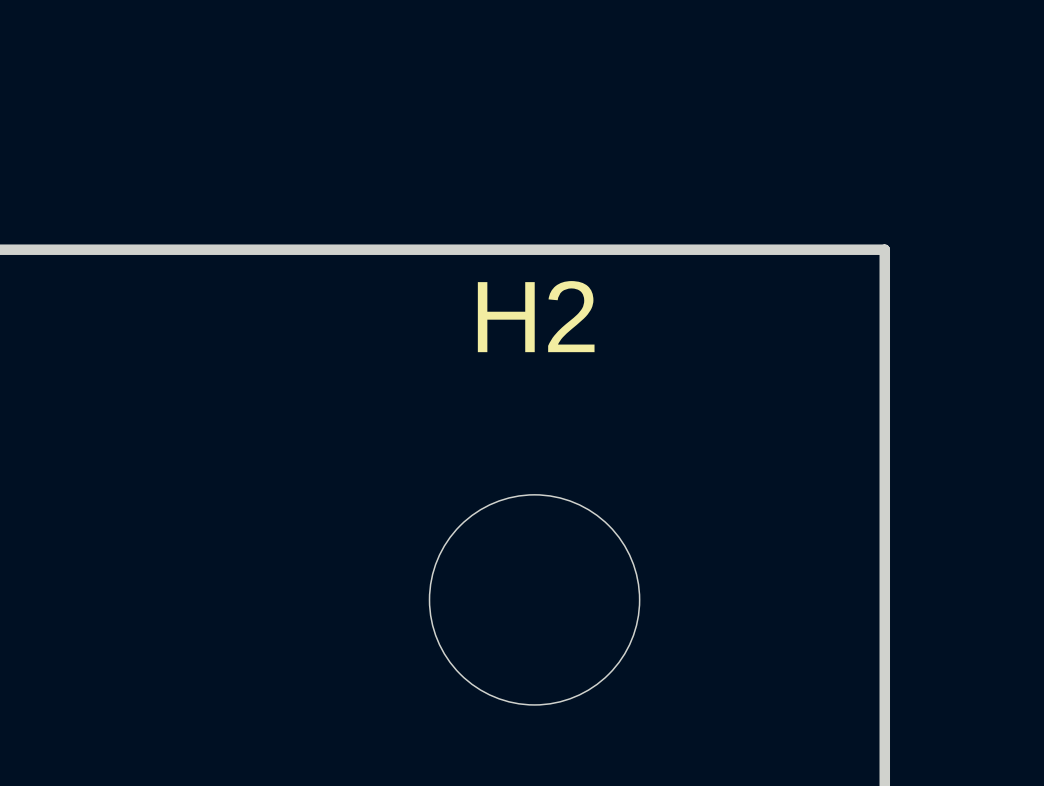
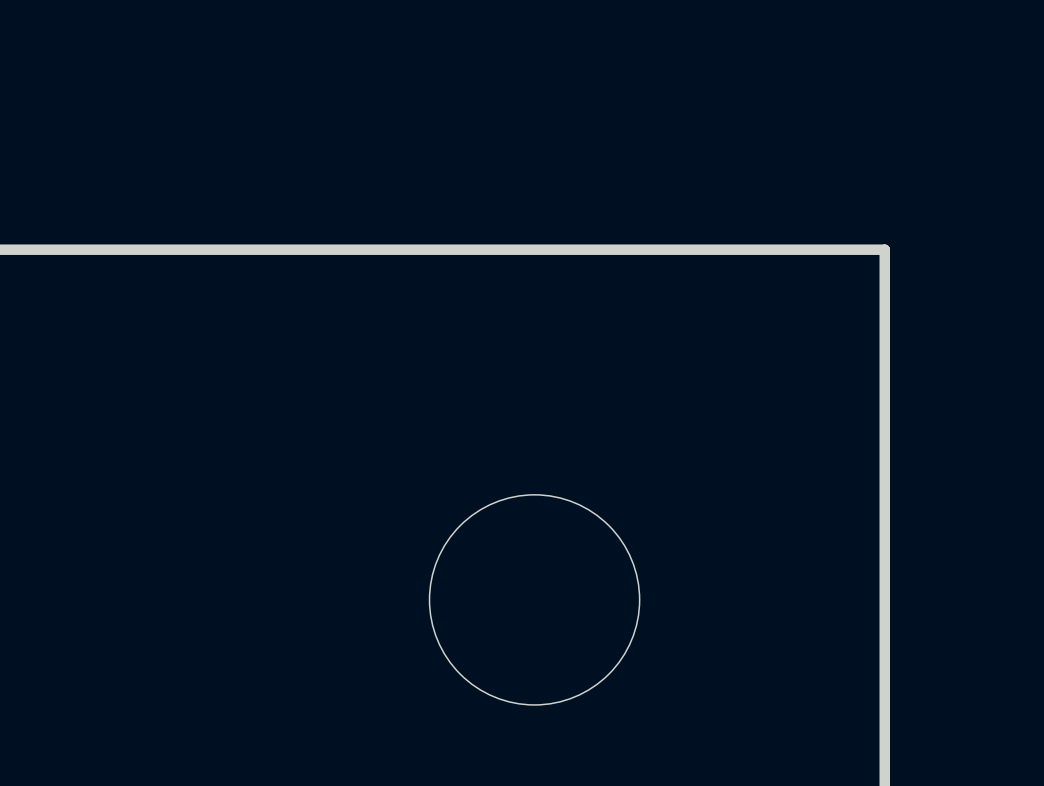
H2 name: H2 (536, 316) -> none

